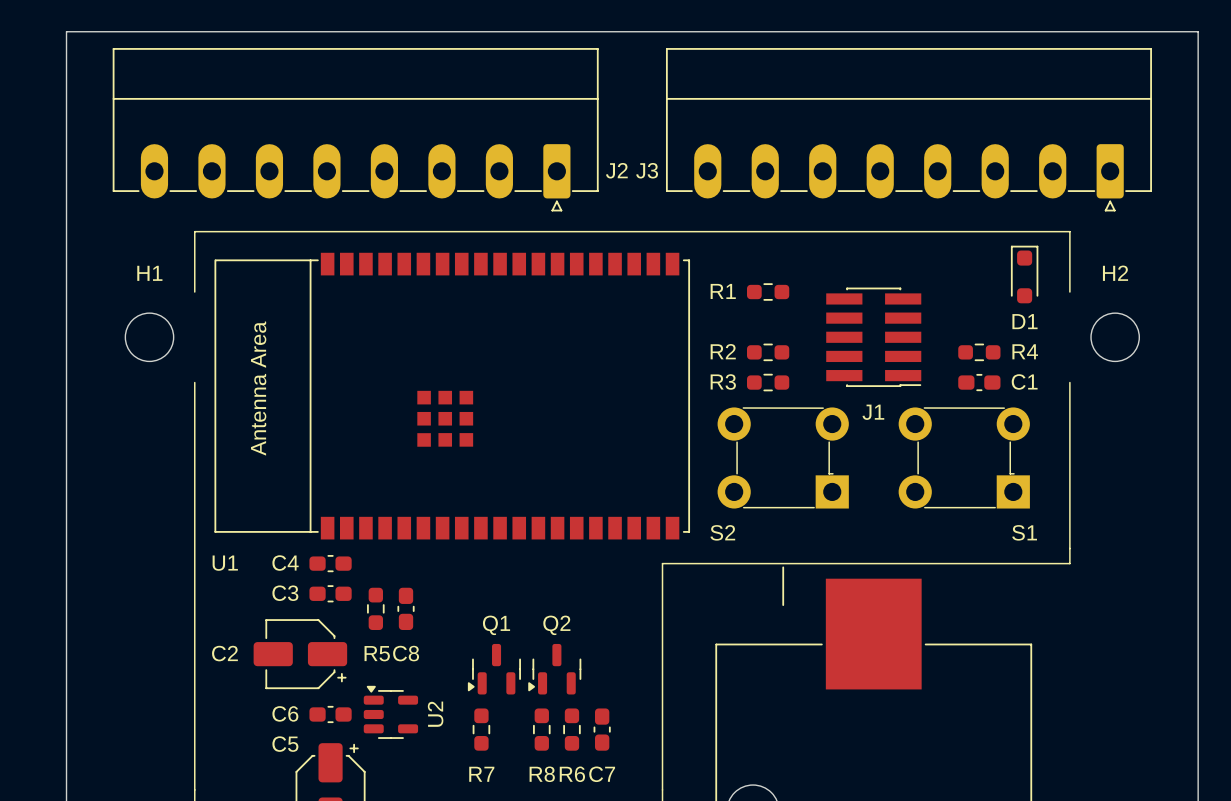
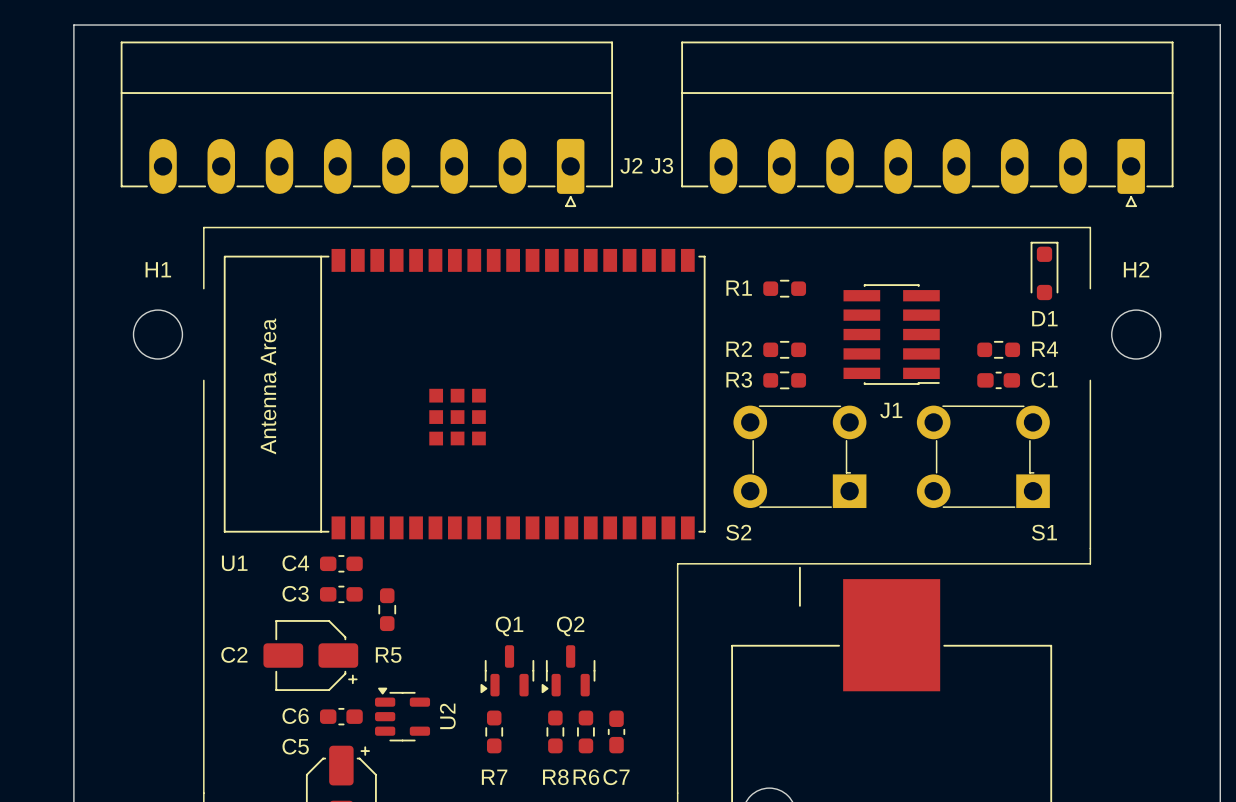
C8: (406, 608) -> none

